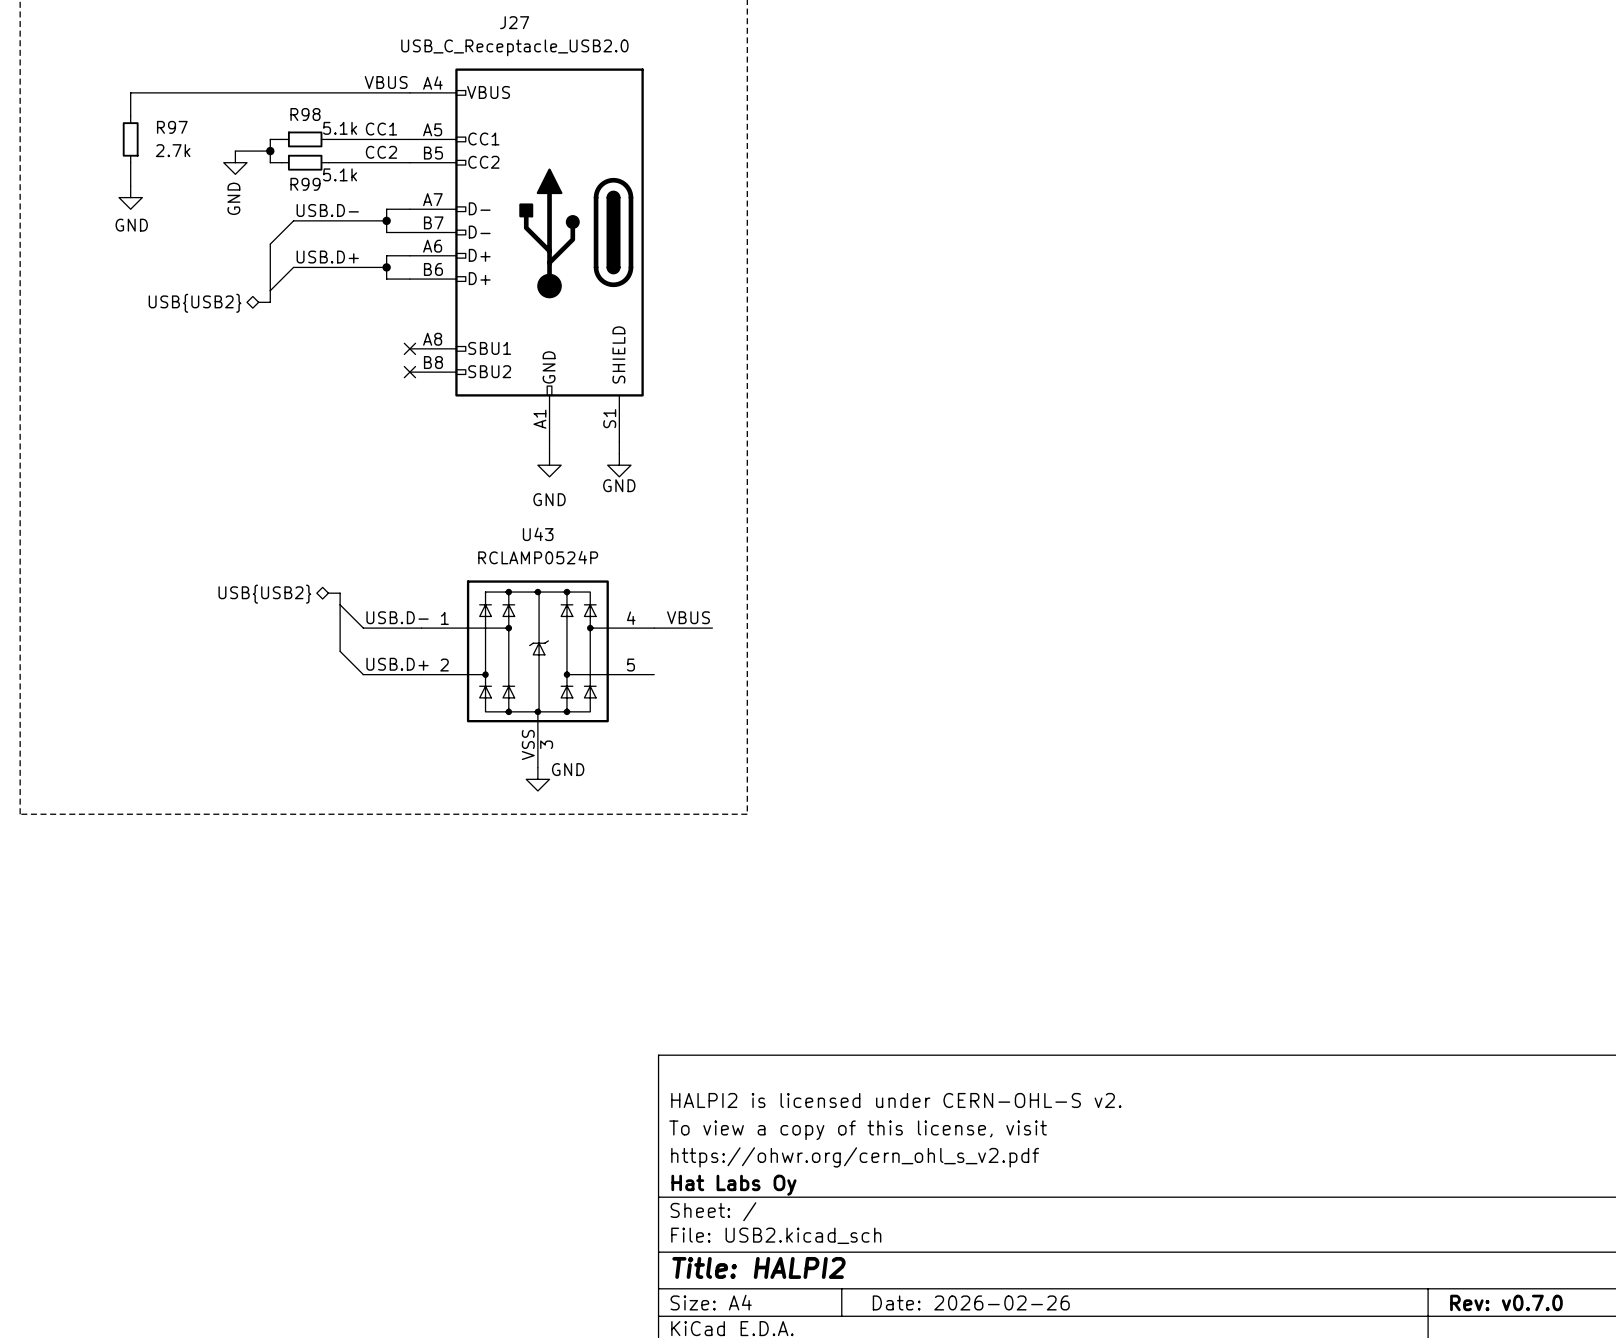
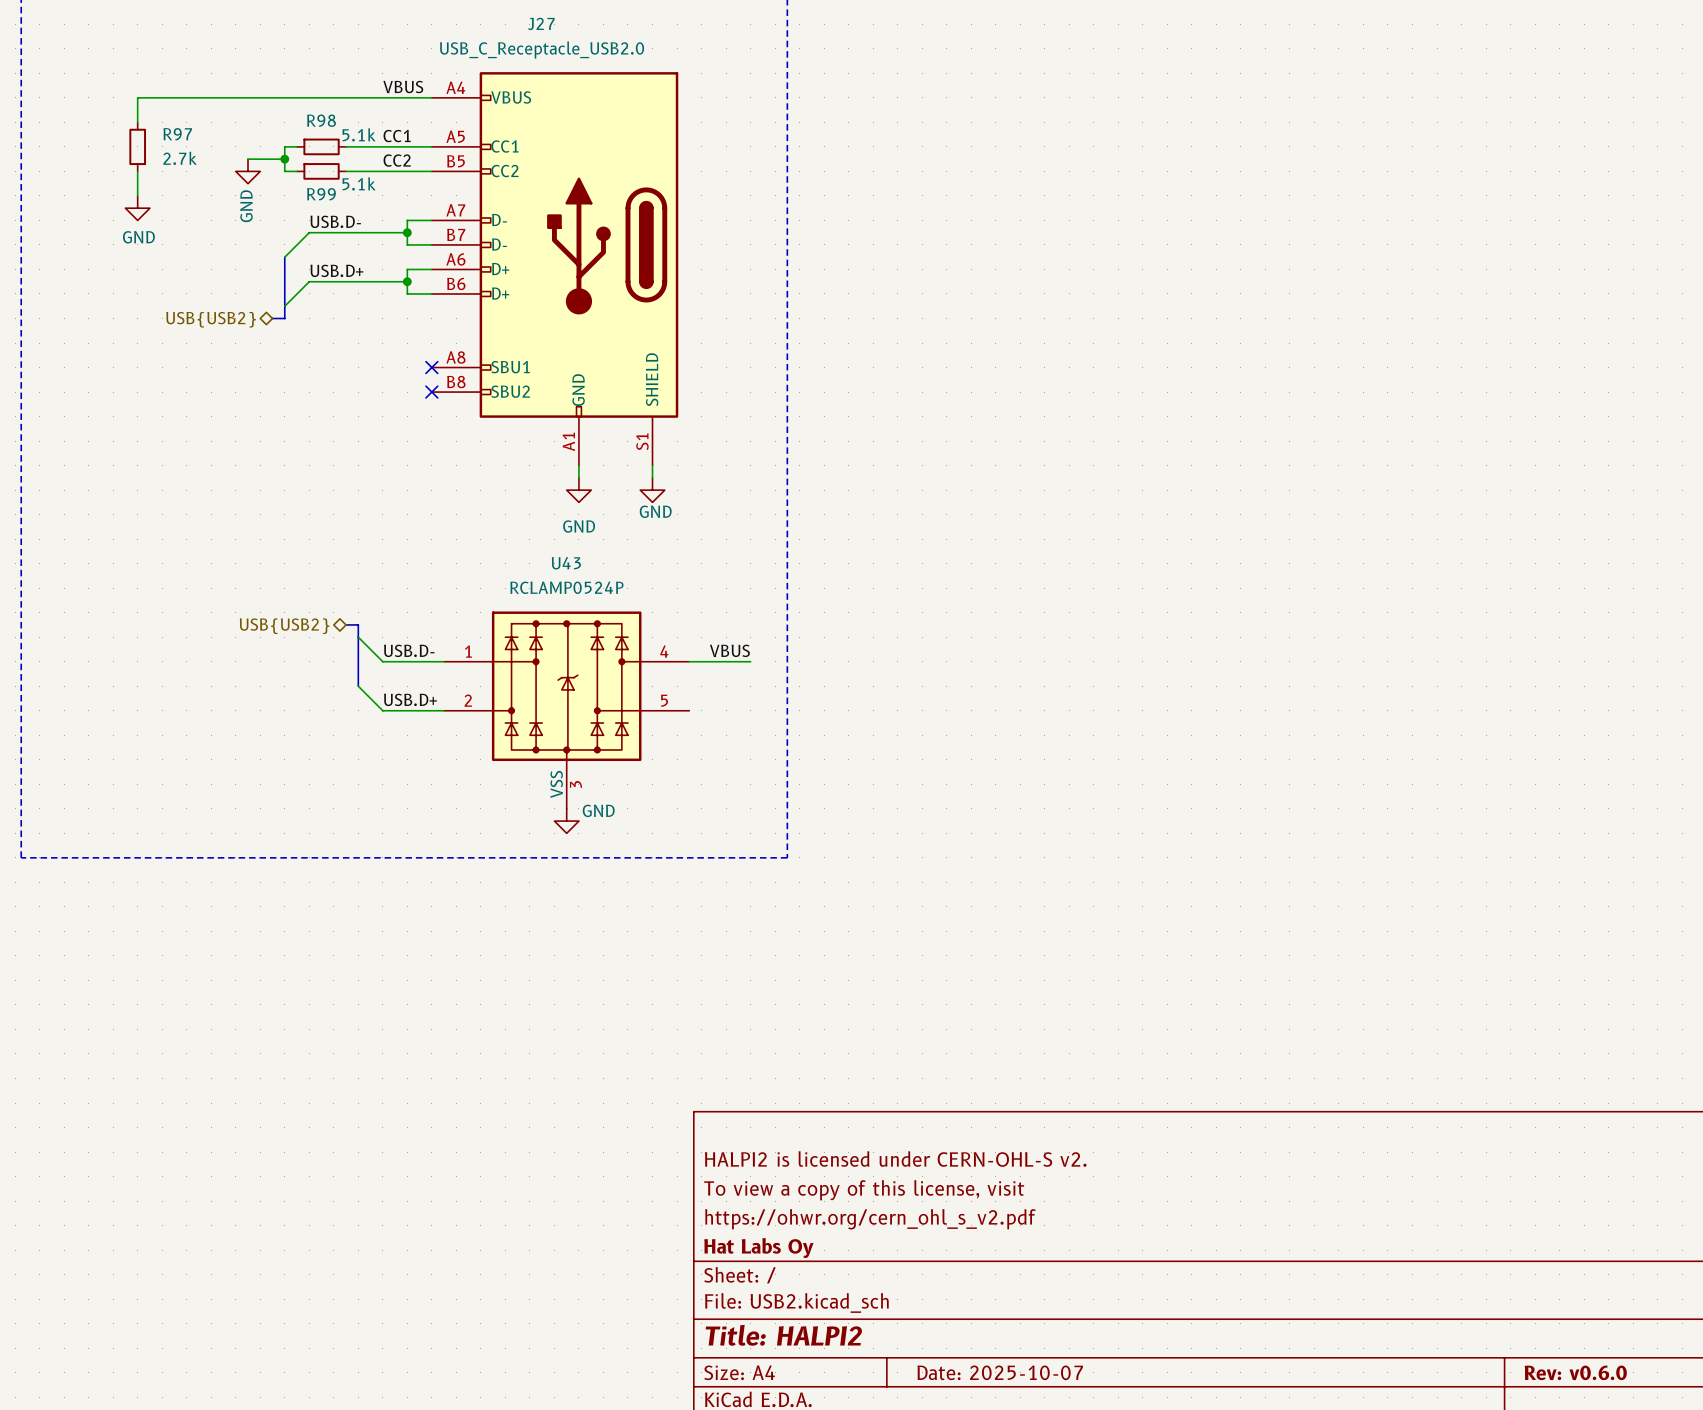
title block: Date: 2026-02-26 (971, 1302) -> Date: 2025-10-07 (1000, 1372)
title block: Rev: v0.7.0 (1506, 1302) -> Rev: v0.6.0 (1575, 1372)

